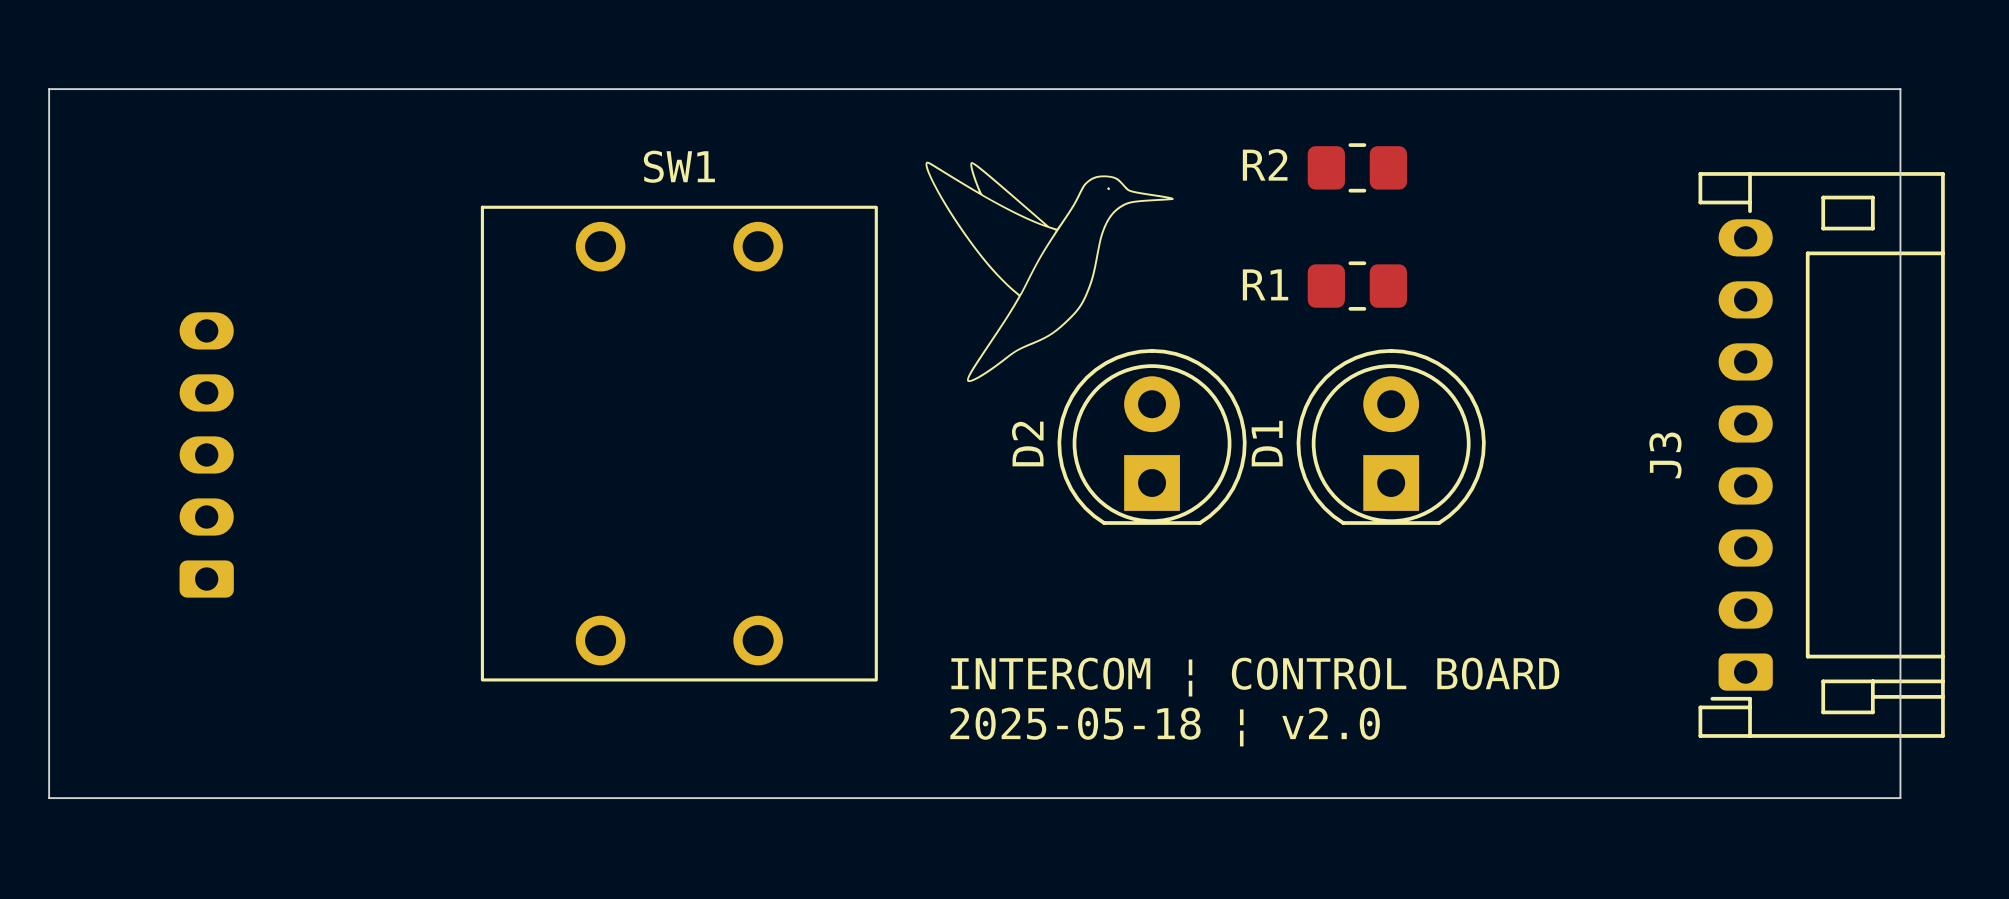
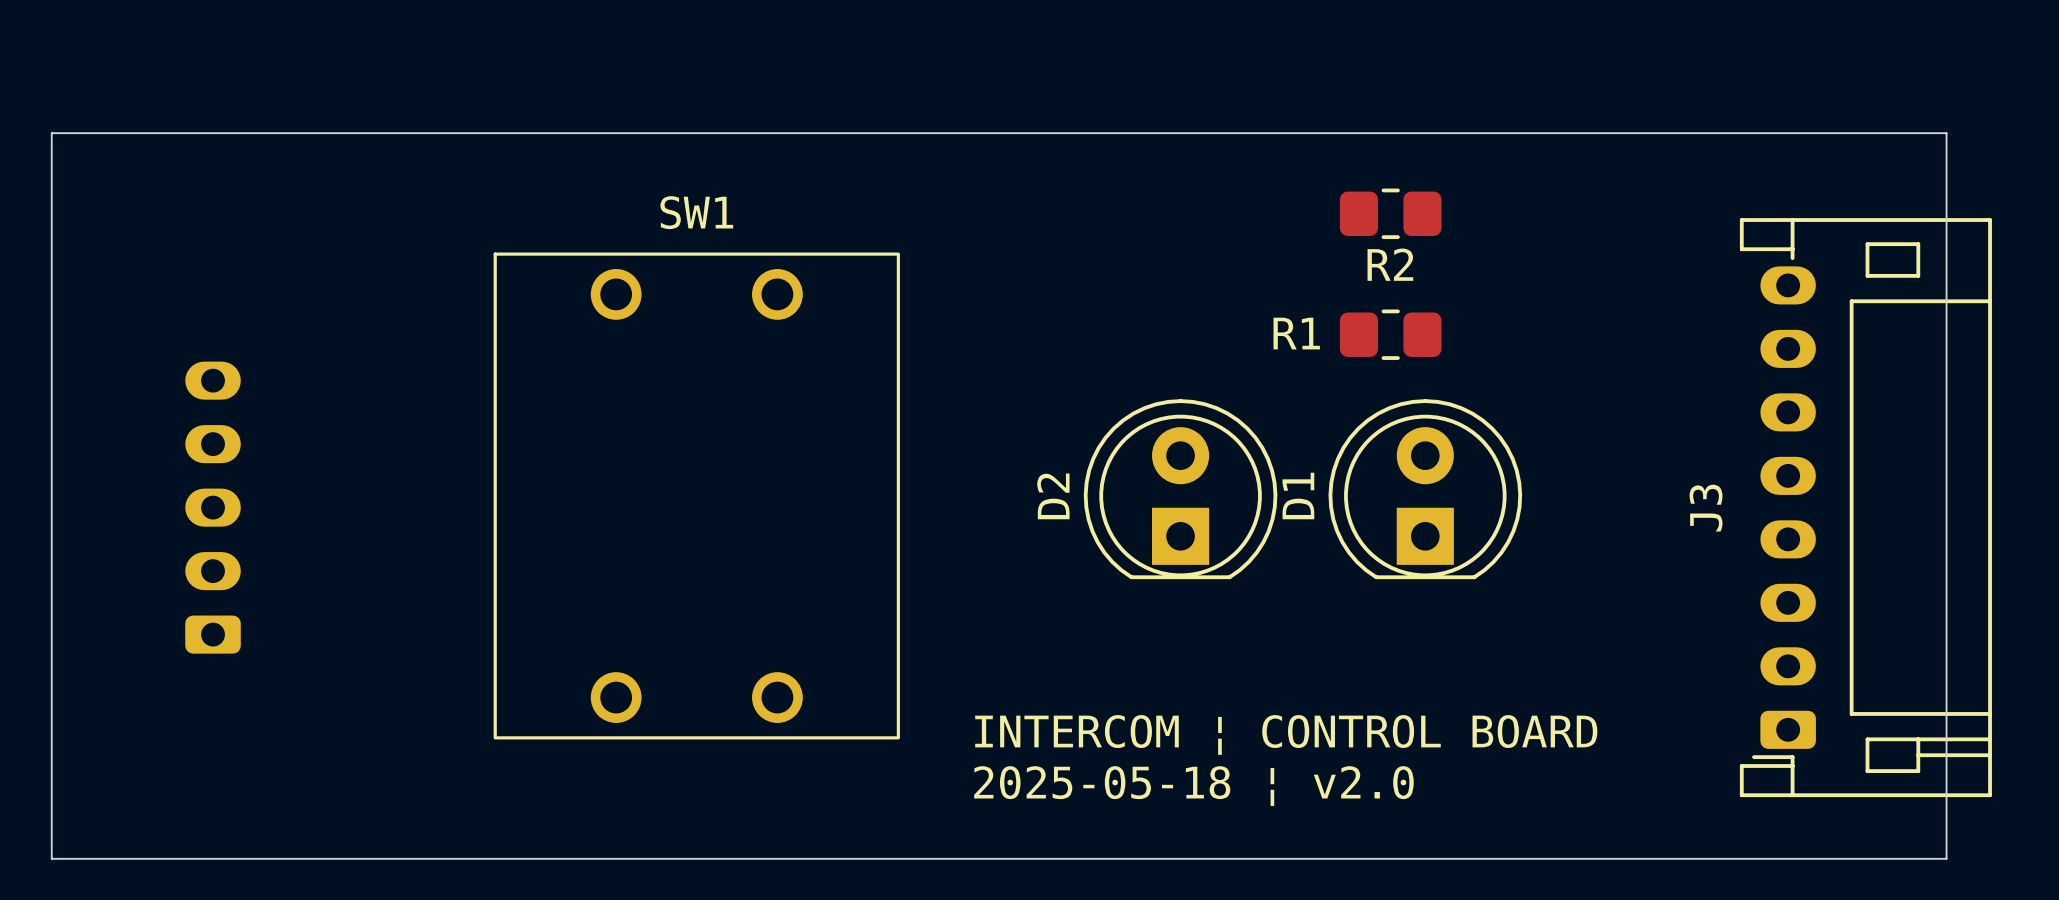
drawing: [925, 161, 1174, 383] -> none
R2 name position: R2 (1265, 164) -> R2 (1390, 264)

